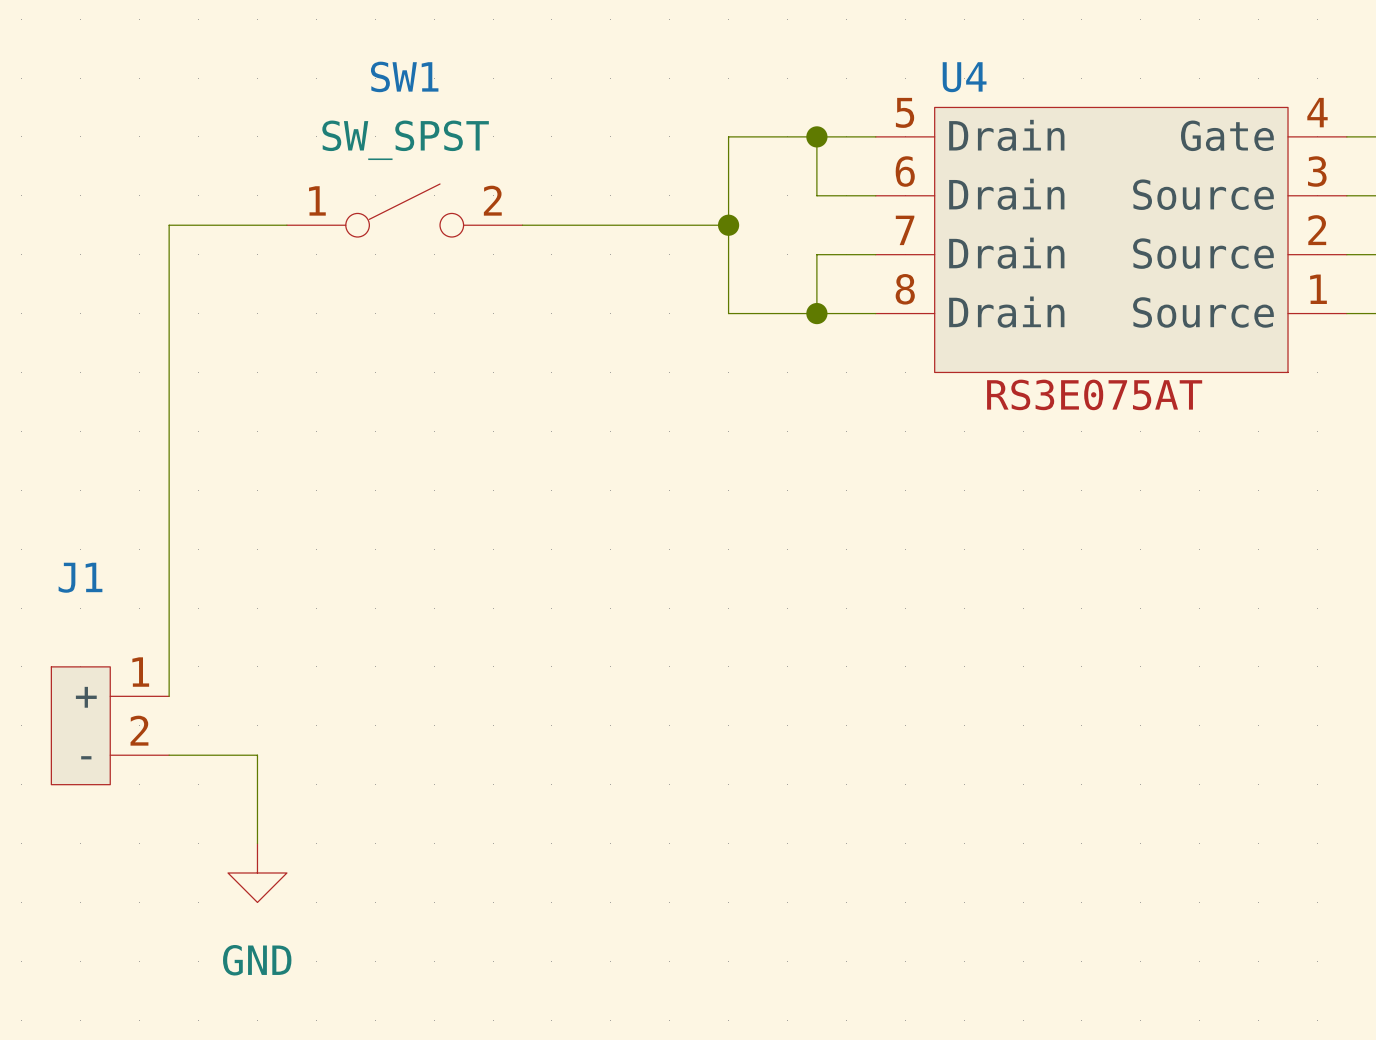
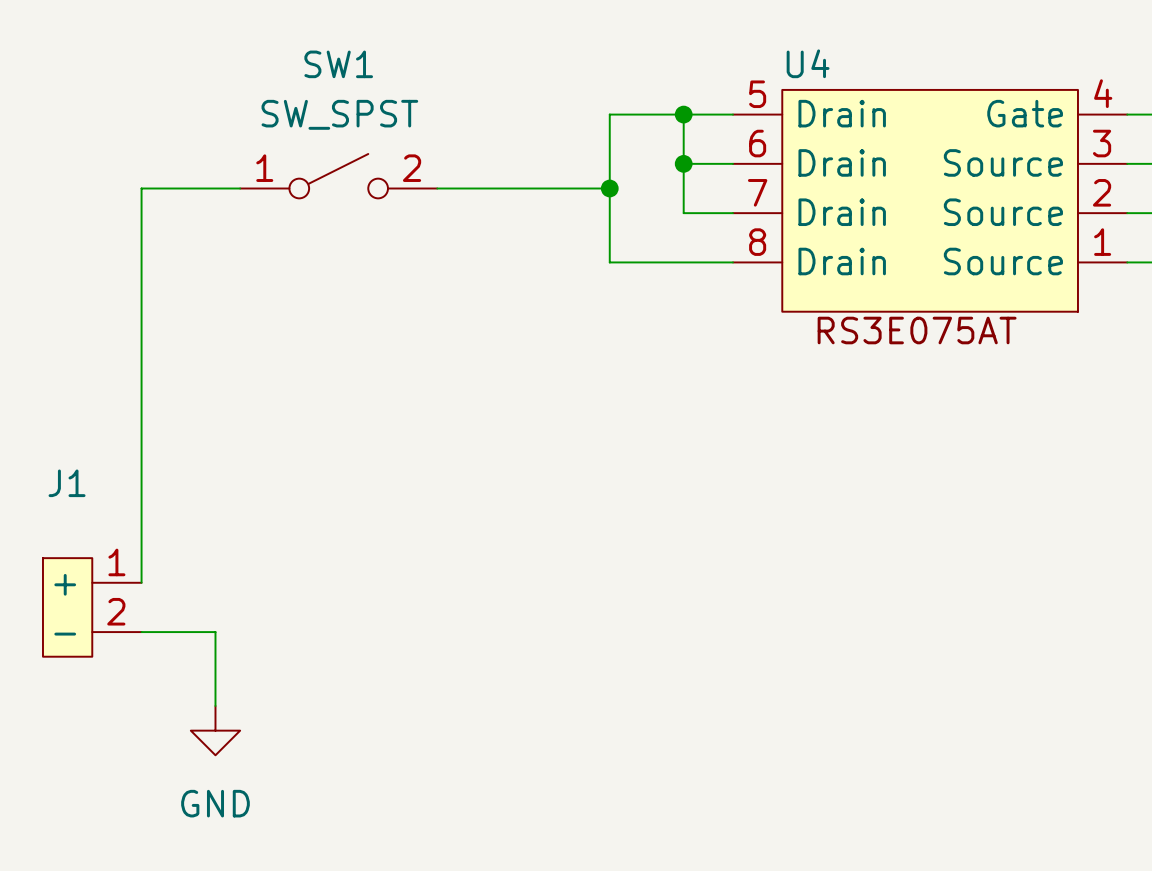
wire: (816, 254) (816, 313) -> (683, 213) (683, 163)
junction position: (816, 313) -> (683, 163)

